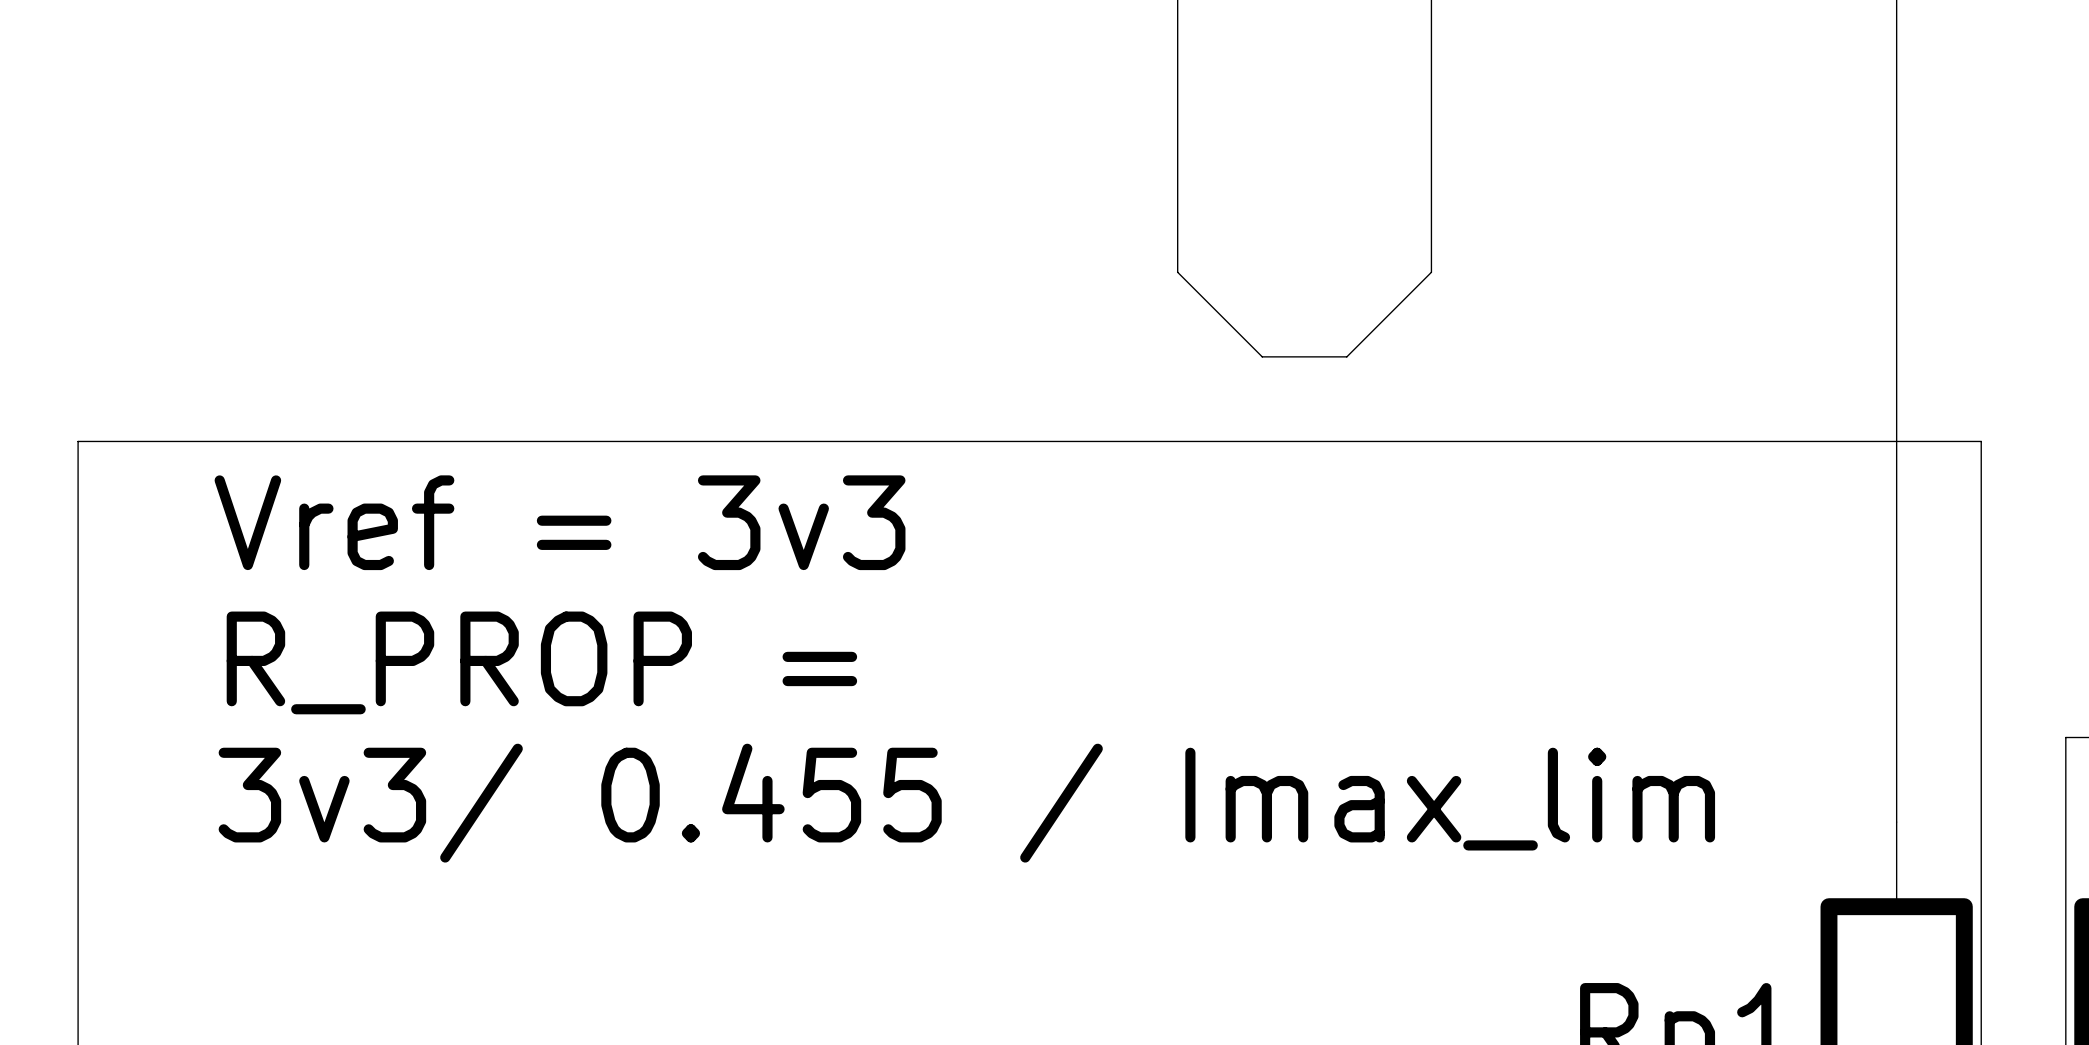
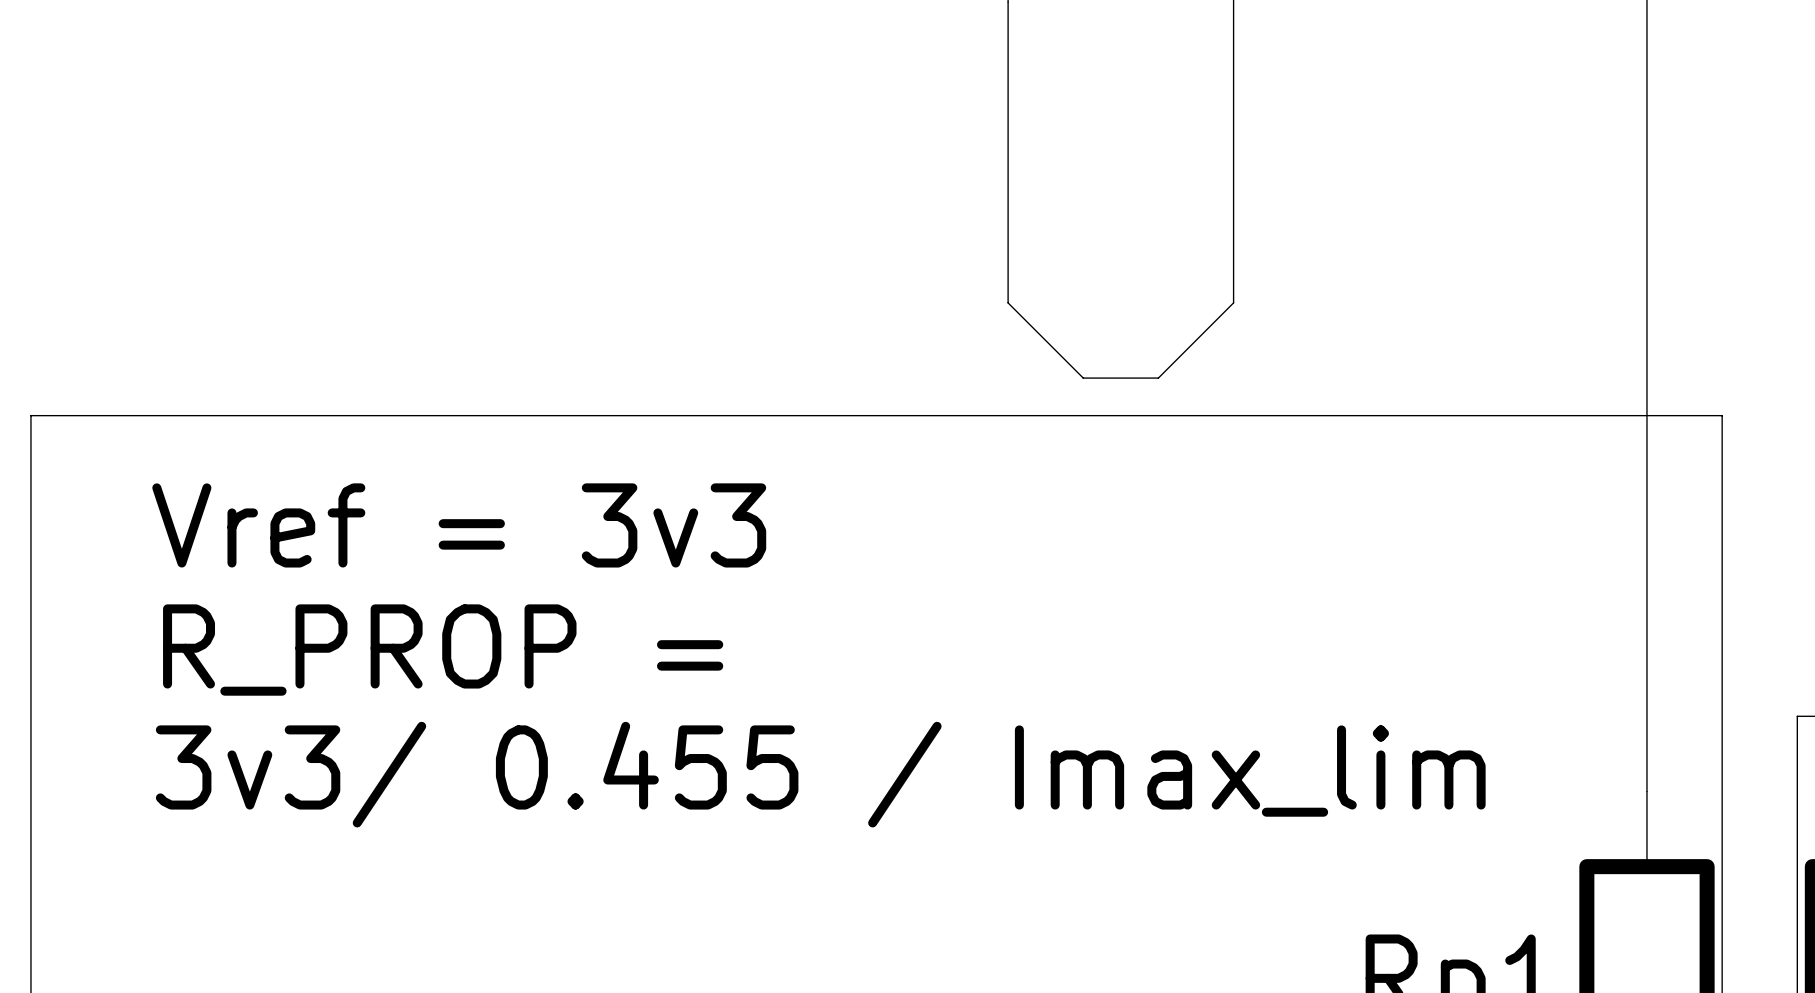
line: (78, 441) (1981, 441) -> (30, 453) (30, 415) (1722, 415) (1722, 453)

